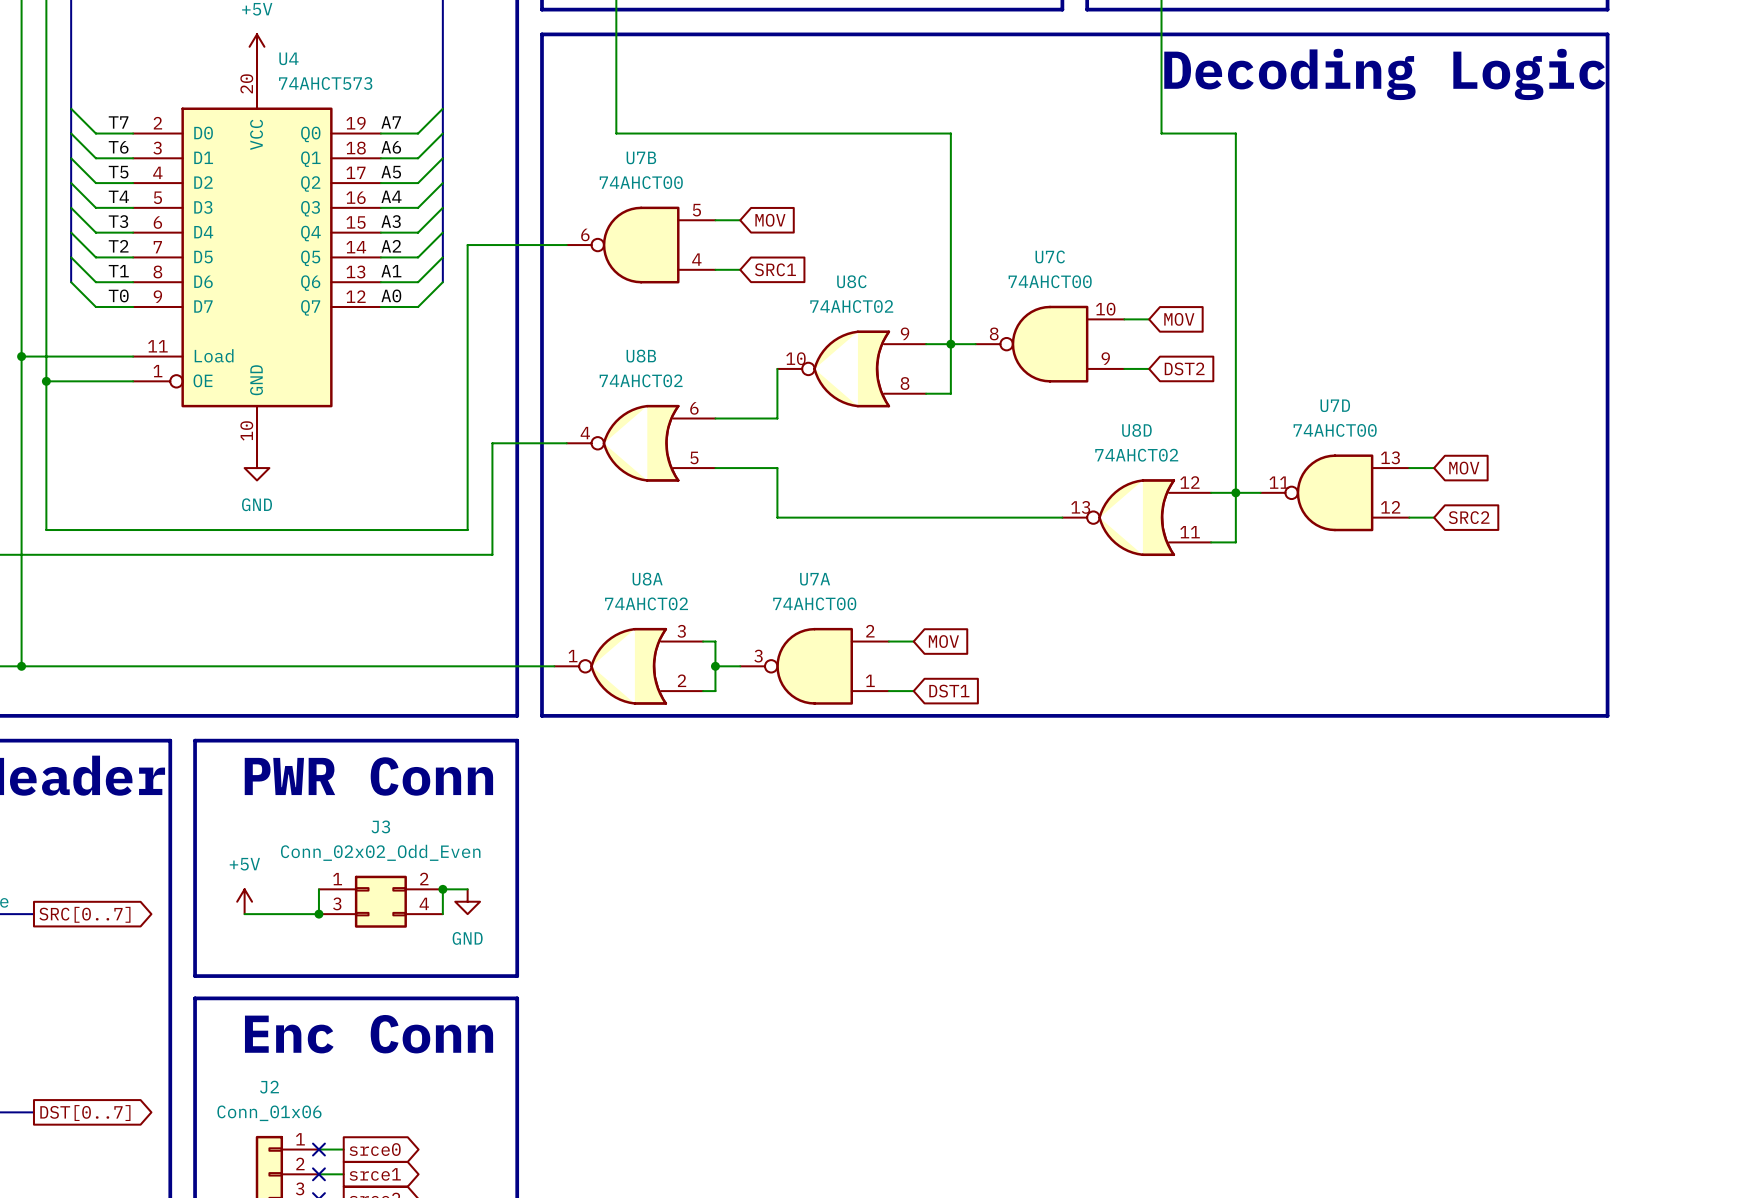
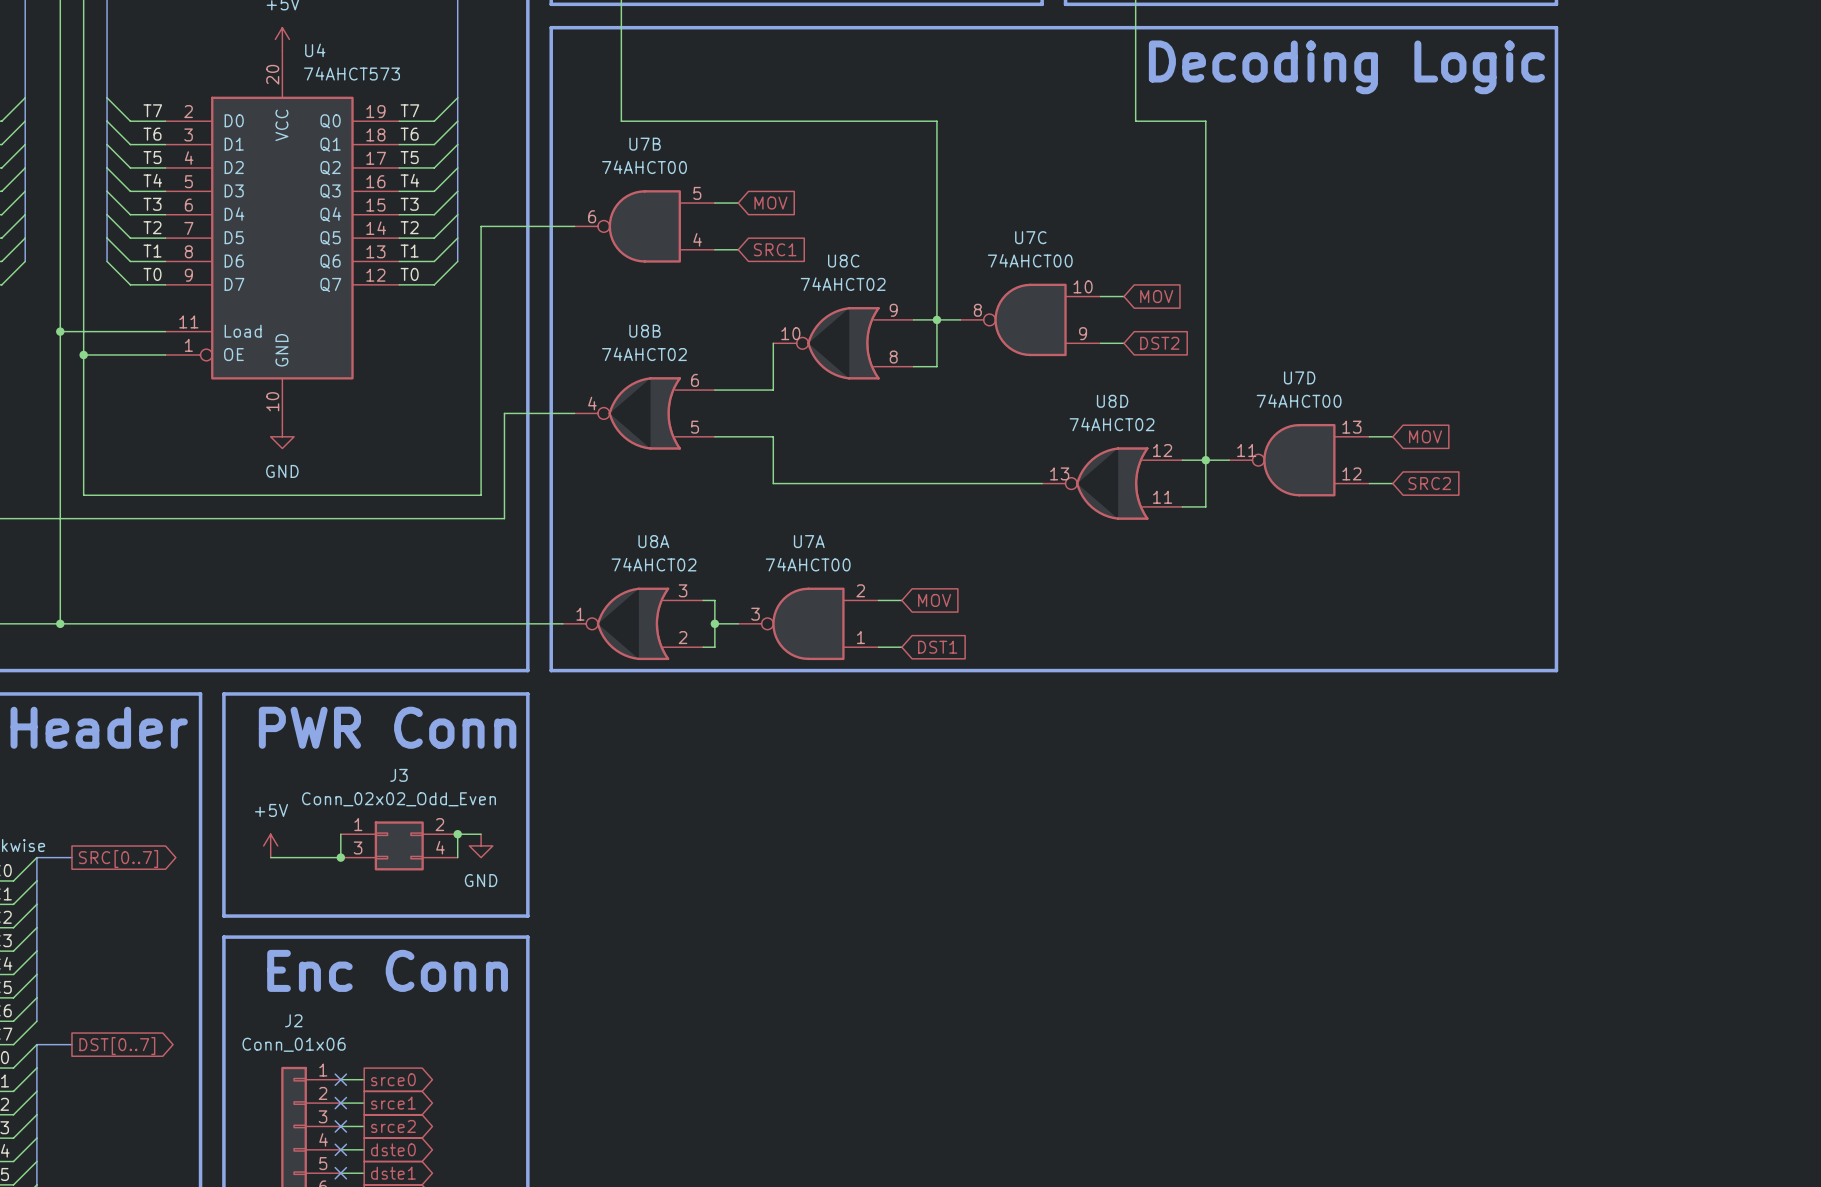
label: A7 (391, 122) -> T7 (409, 110)
label: A6 (391, 147) -> T6 (409, 134)
label: A5 (391, 172) -> T5 (409, 157)
label: A4 (391, 196) -> T4 (409, 180)
label: A3 (391, 221) -> T3 (409, 204)
label: A2 (391, 246) -> T2 (409, 227)
label: A1 (391, 271) -> T1 (409, 251)
label: A0 (391, 295) -> T0 (409, 274)

